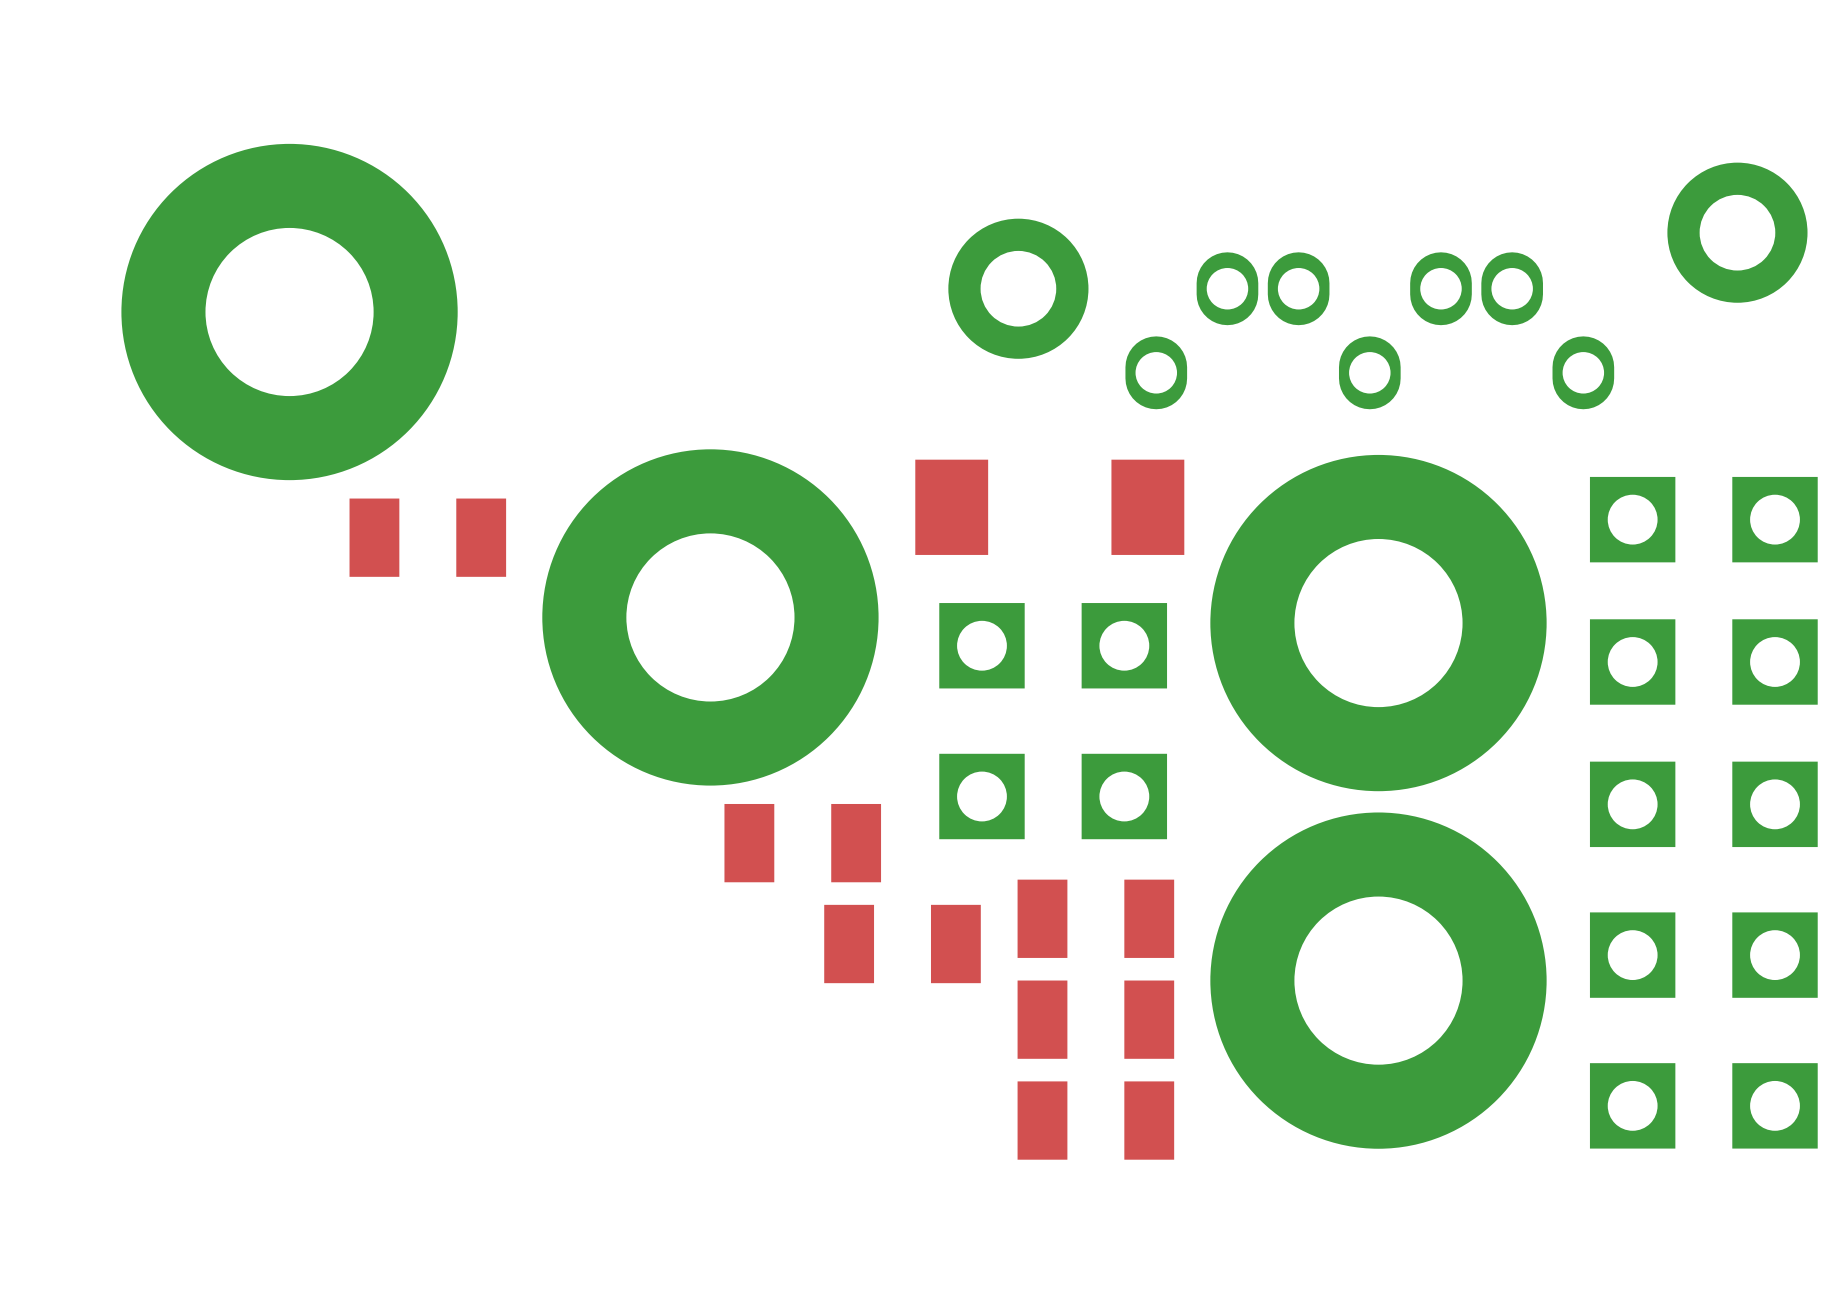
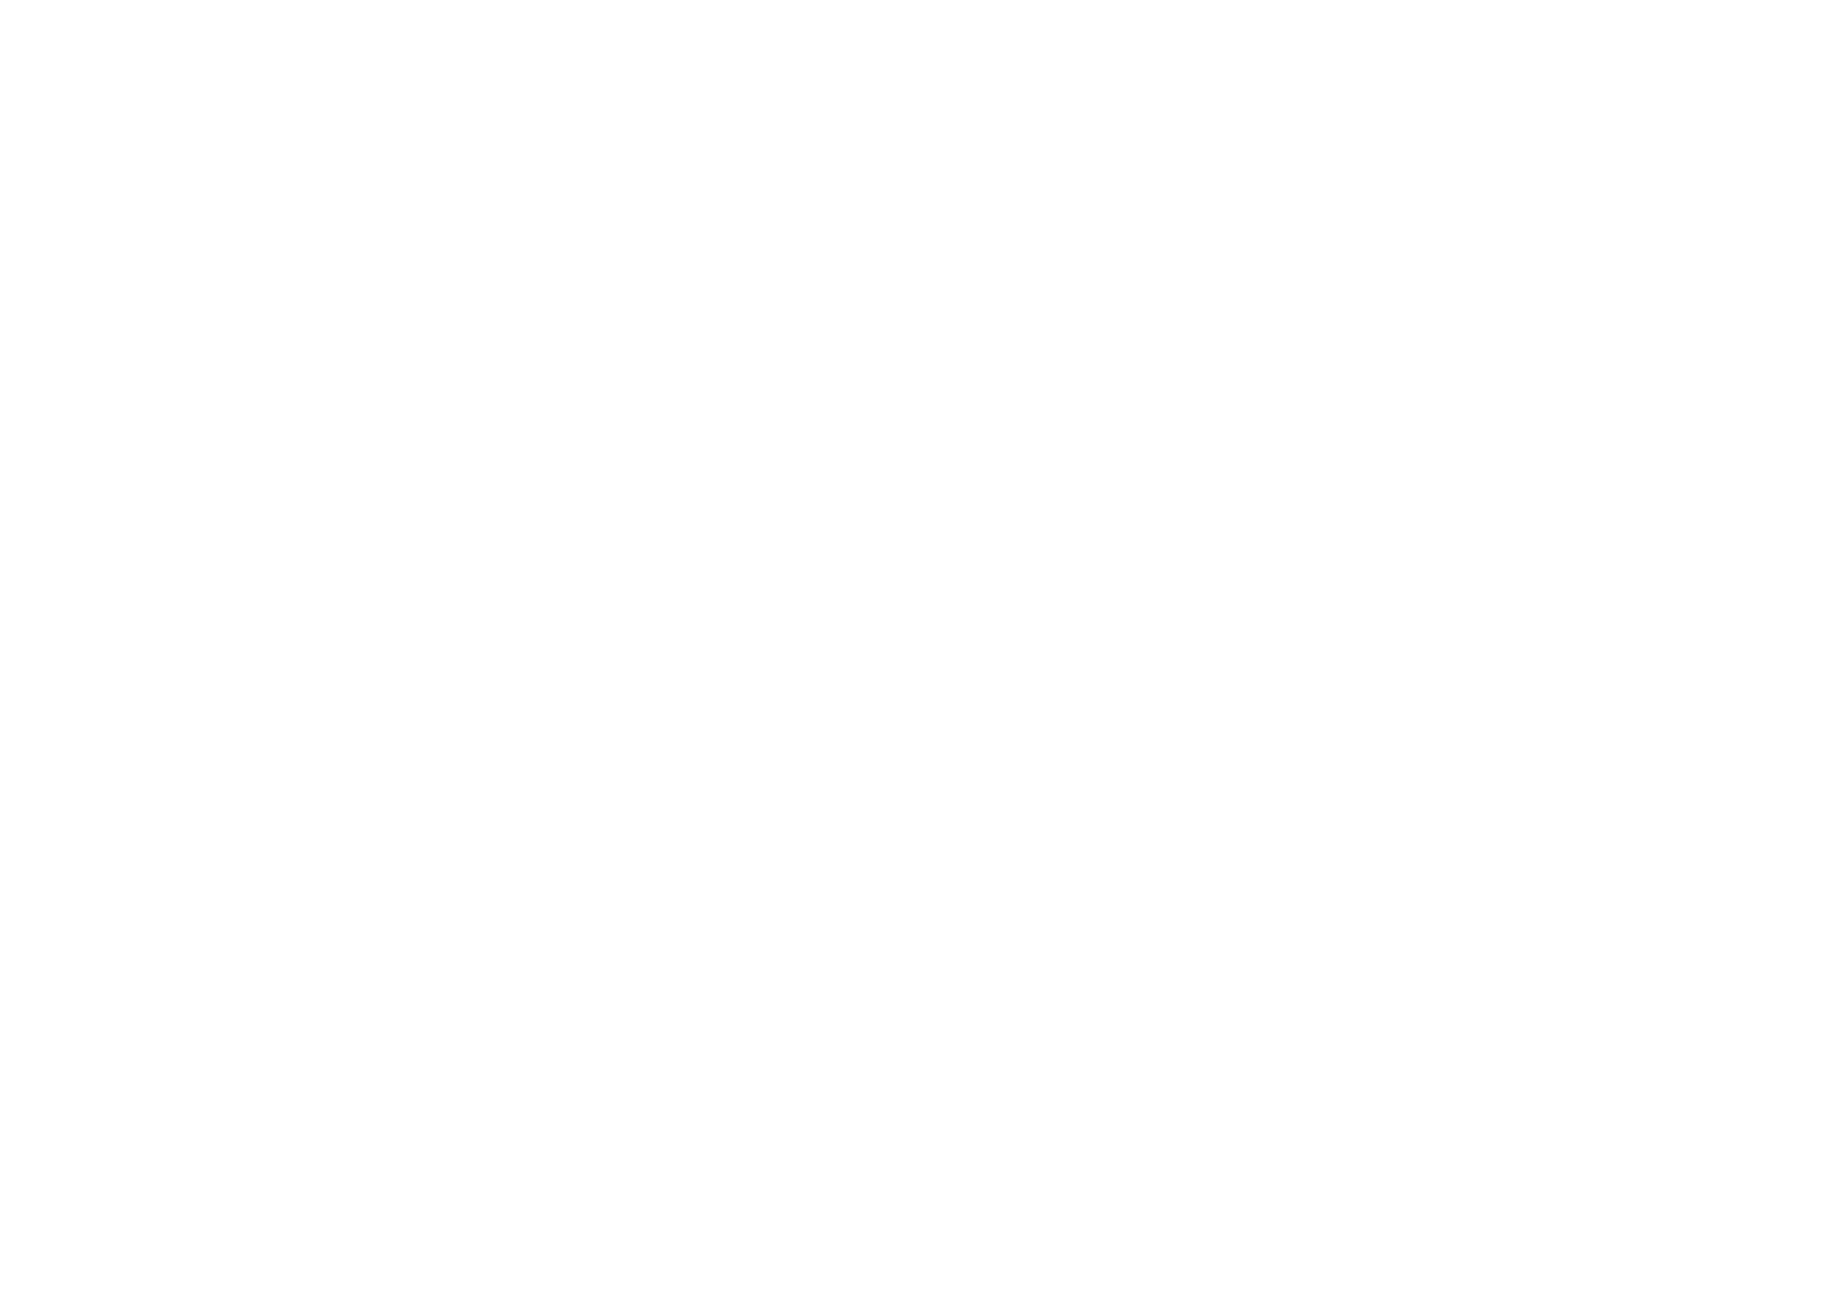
part: (1377, 285) -> none
part: (289, 312) -> none
part: (1049, 507) -> none
part: (427, 537) -> none
part: (710, 617) -> none
part: (1378, 623) -> none
part: (1053, 645) -> none
part: (1703, 661) -> none
part: (1053, 796) -> none
part: (802, 843) -> none
part: (1095, 918) -> none
part: (902, 944) -> none
part: (1703, 955) -> none
part: (1378, 980) -> none
part: (1095, 1019) -> none
part: (1703, 1105) -> none
part: (1095, 1120) -> none

